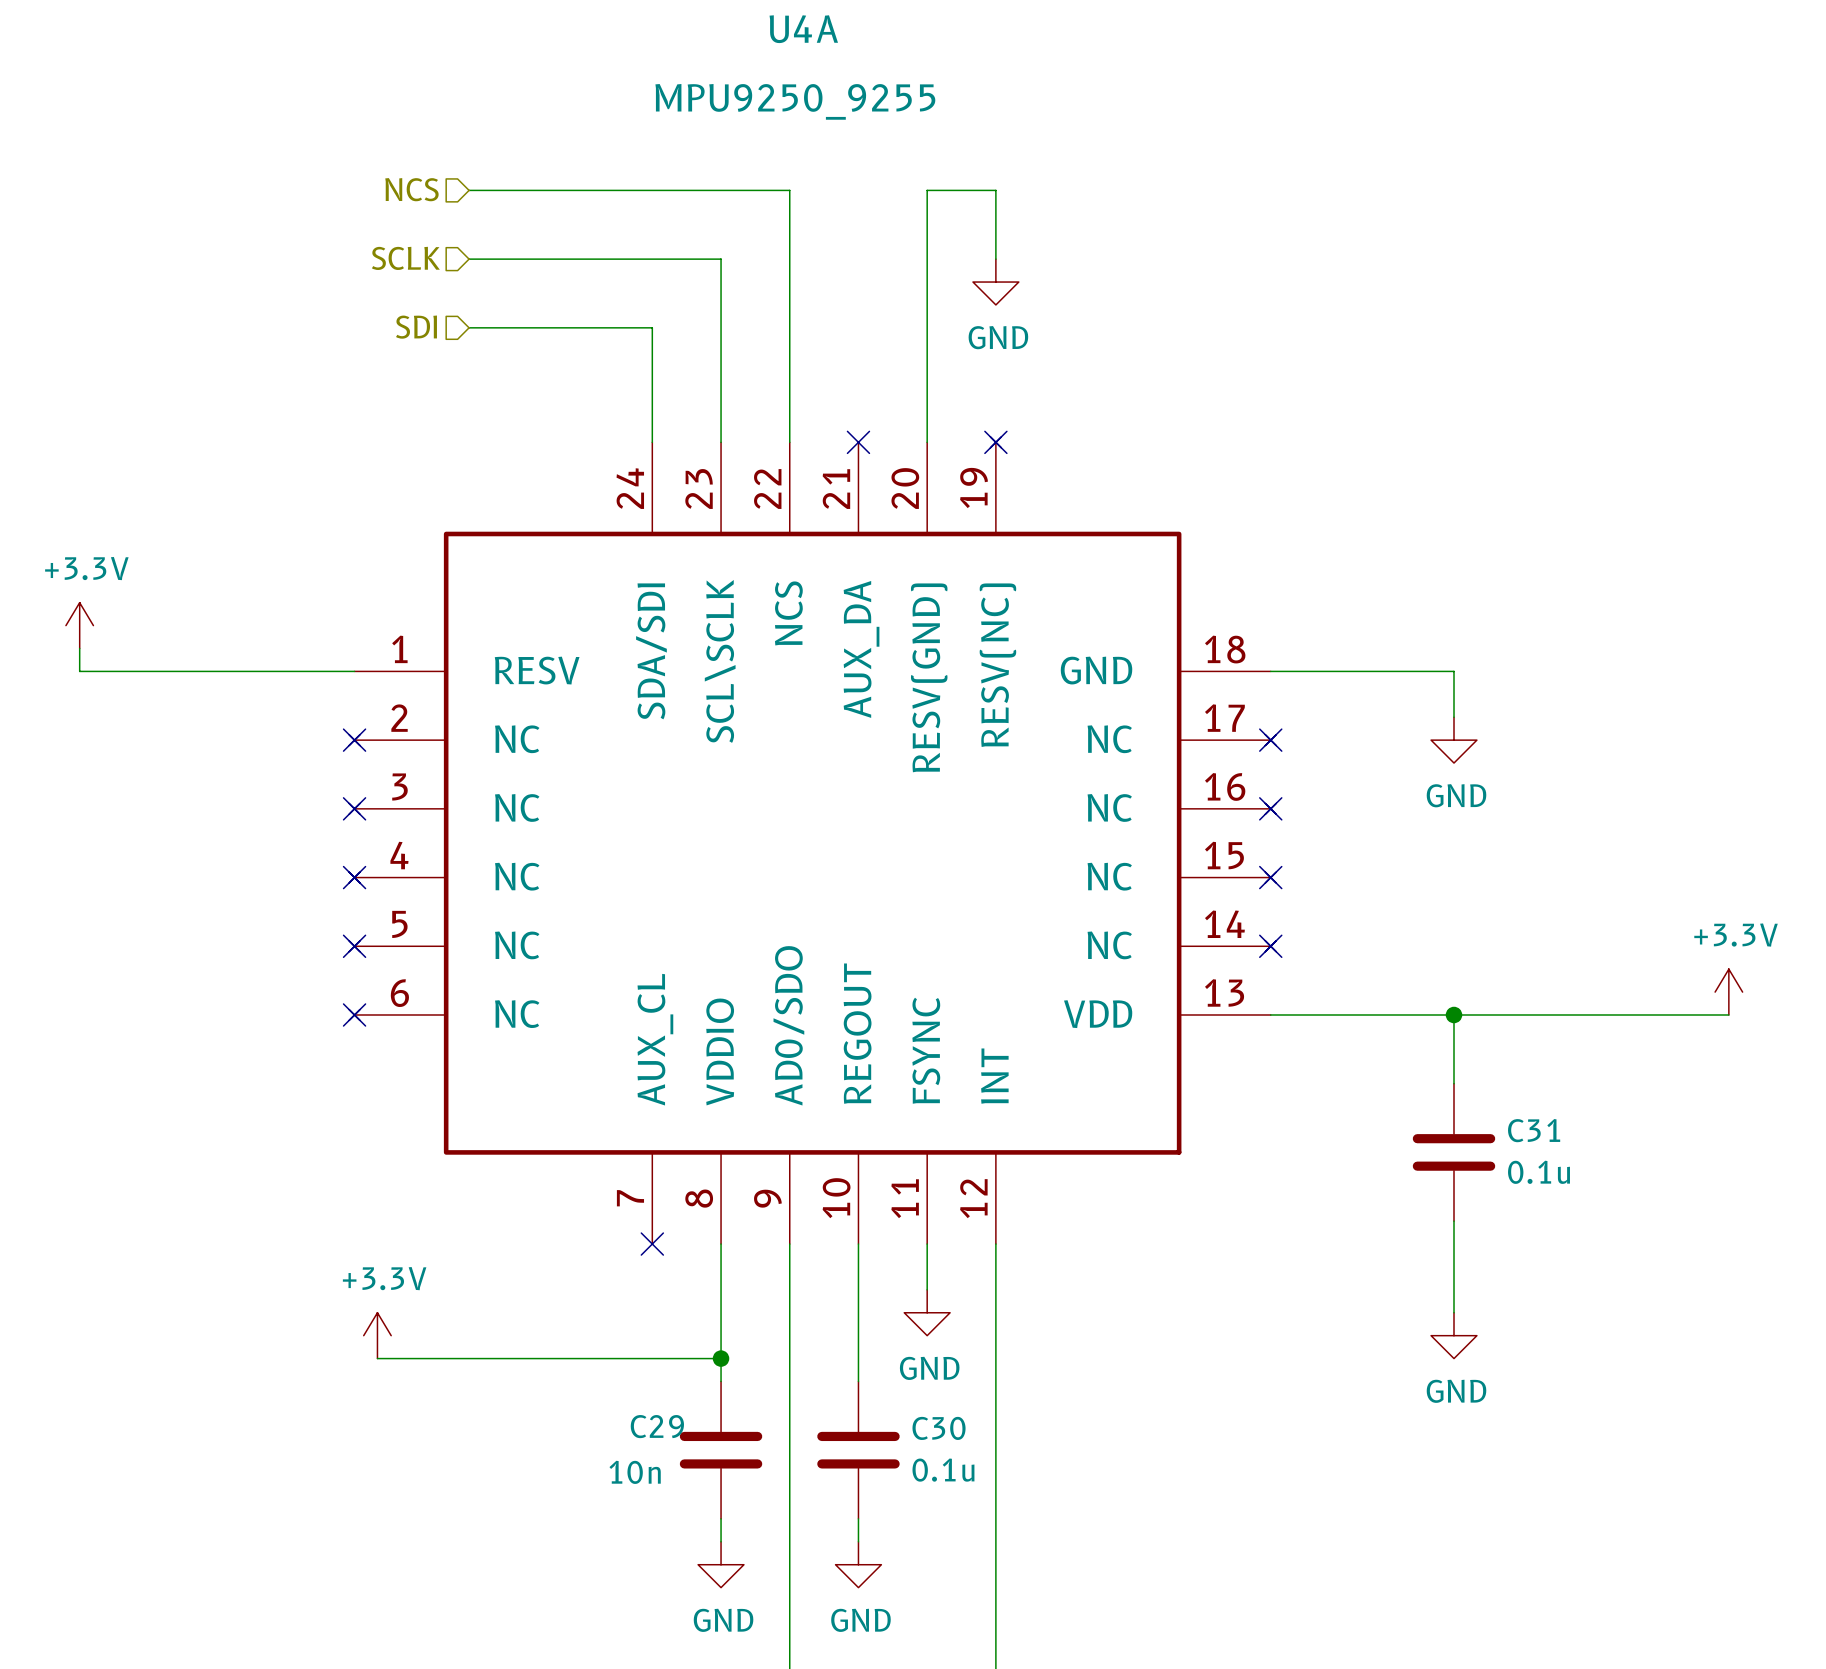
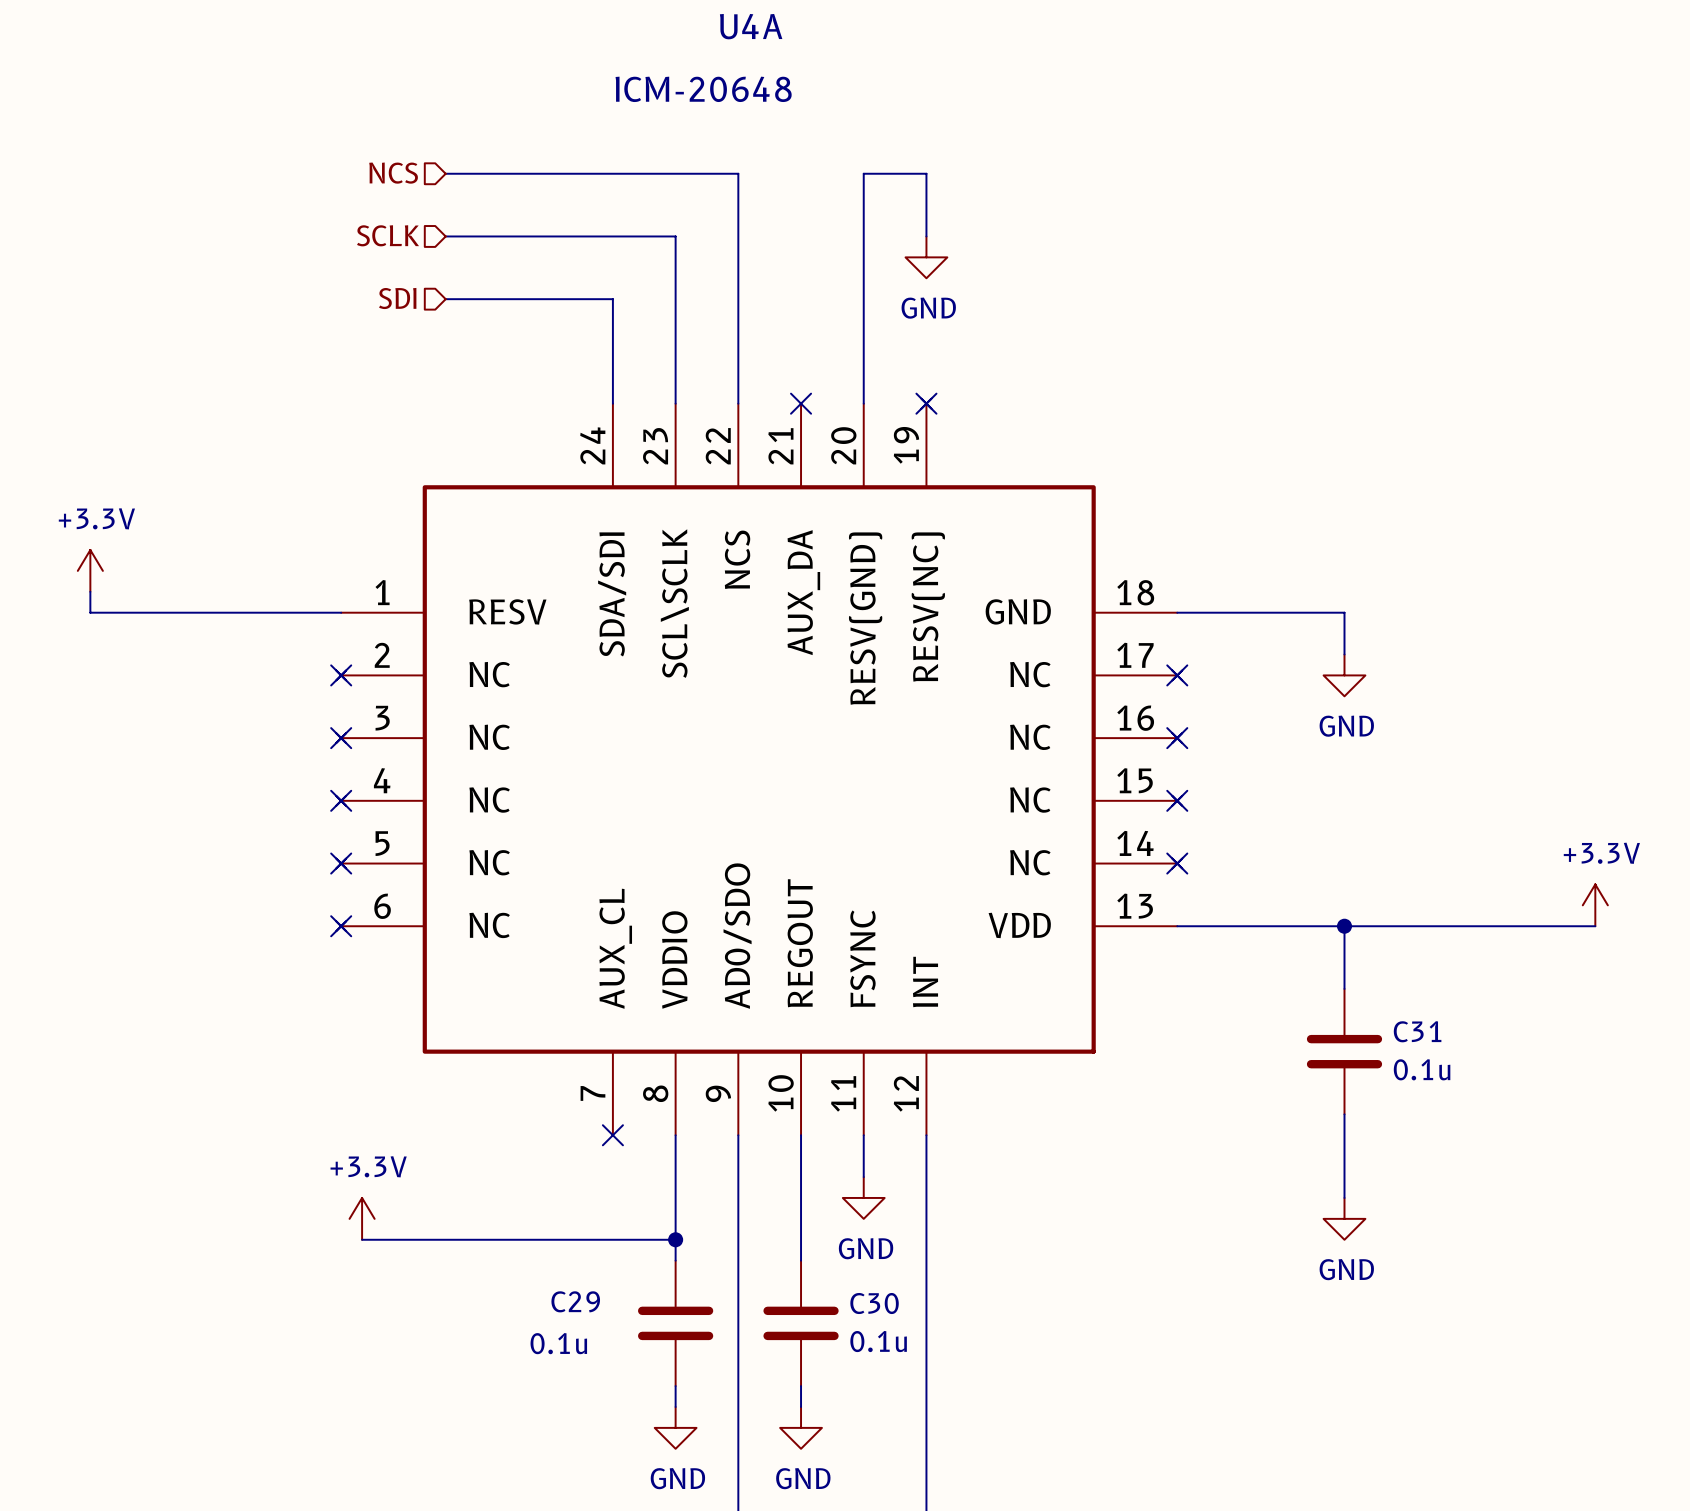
U4A value: MPU9250_9255 (795, 101) -> ICM-20648 (703, 89)
C29 name position: C29 (657, 1426) -> C29 (575, 1301)
C29 value: 10n (635, 1472) -> 0.1u (558, 1343)

